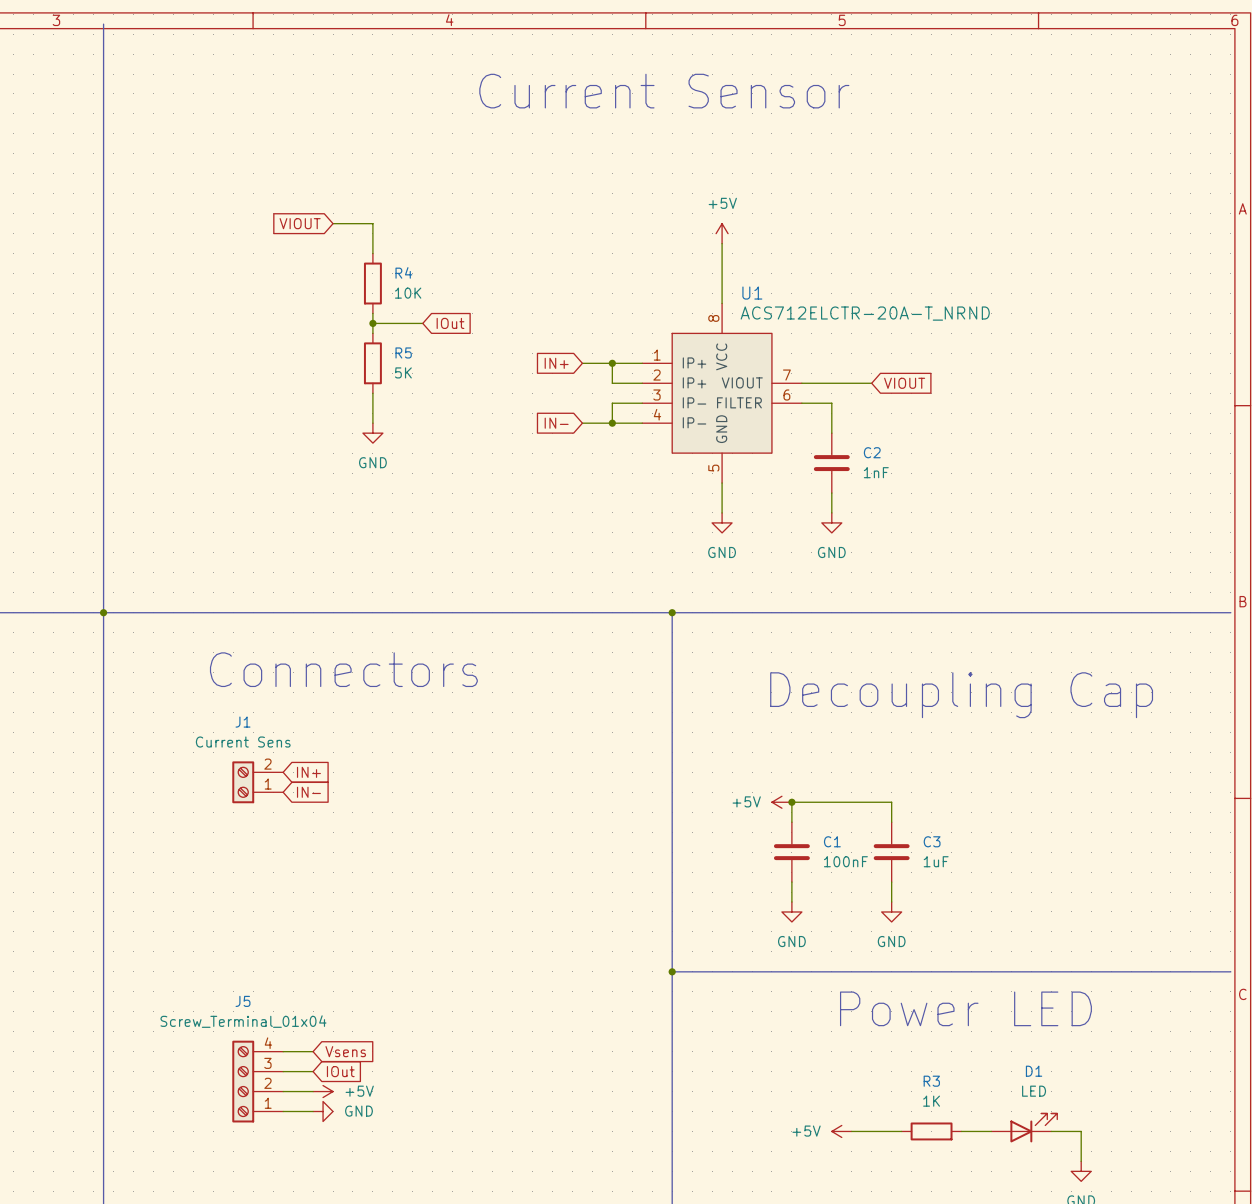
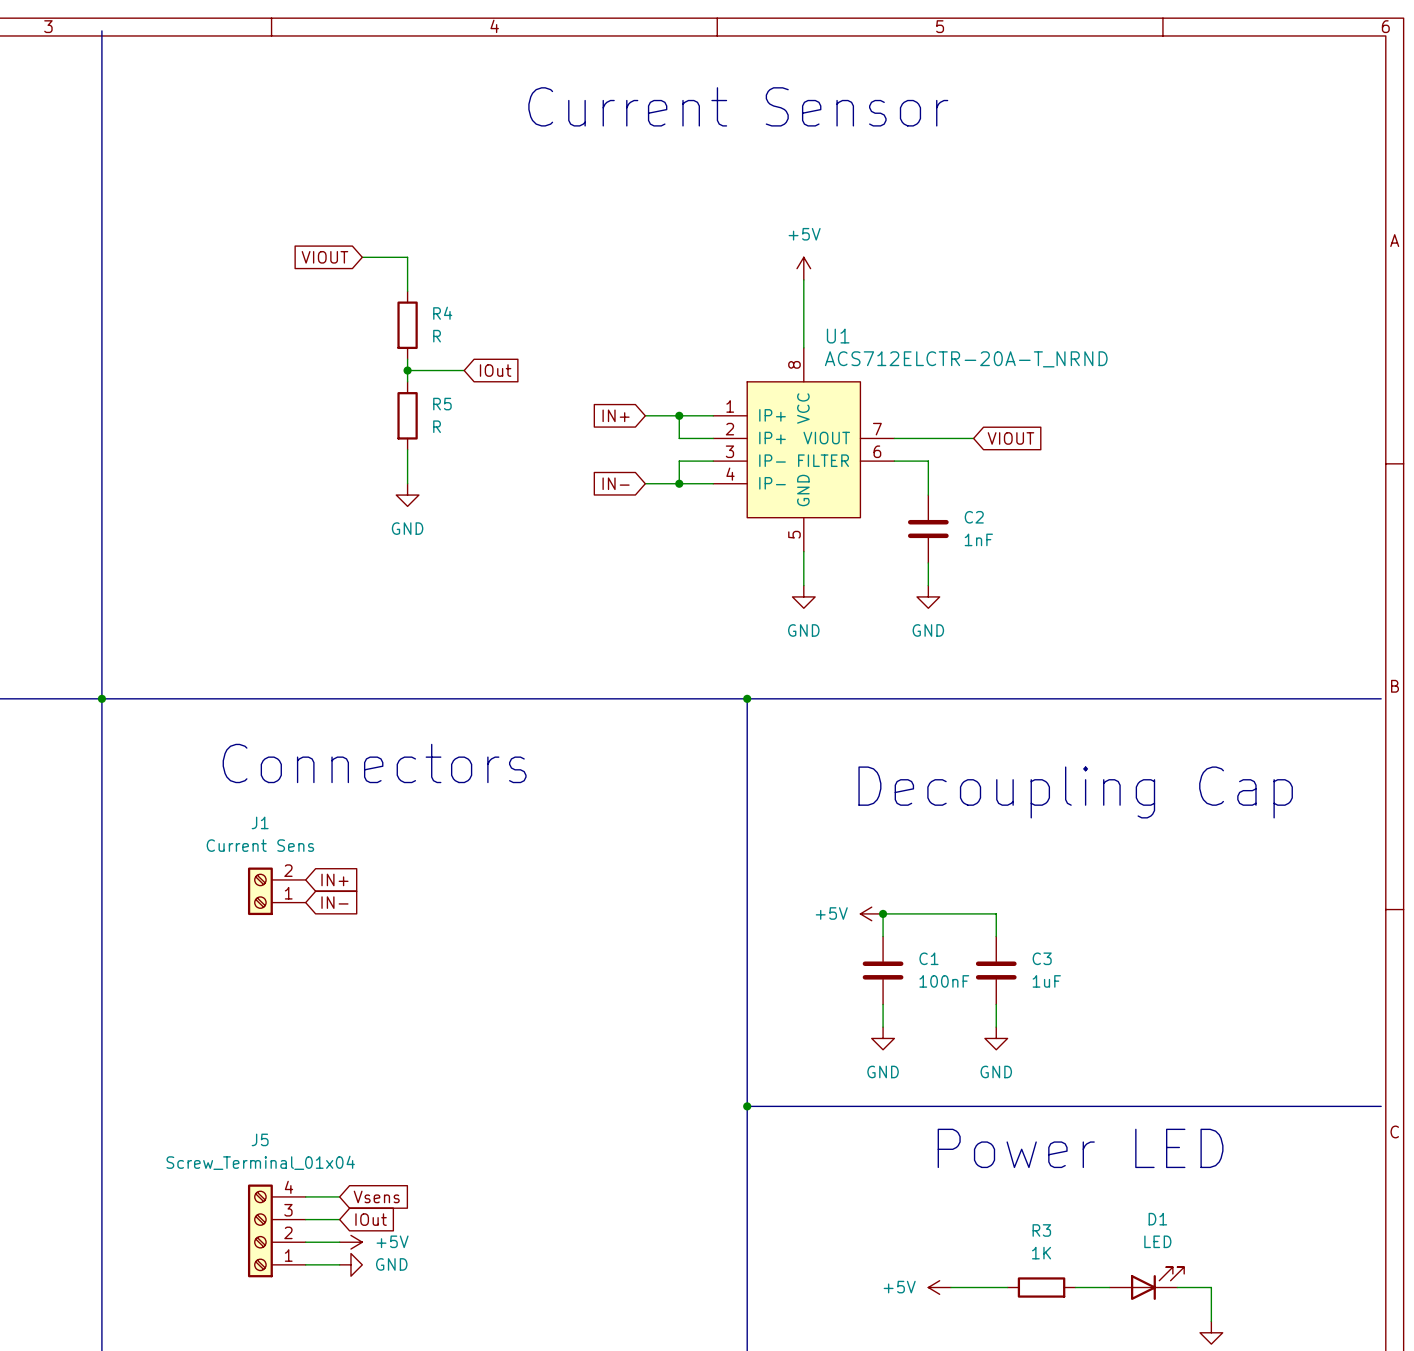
R4 value: 10K (408, 293) -> R (437, 336)
R5 value: 5K (403, 372) -> R (437, 426)

